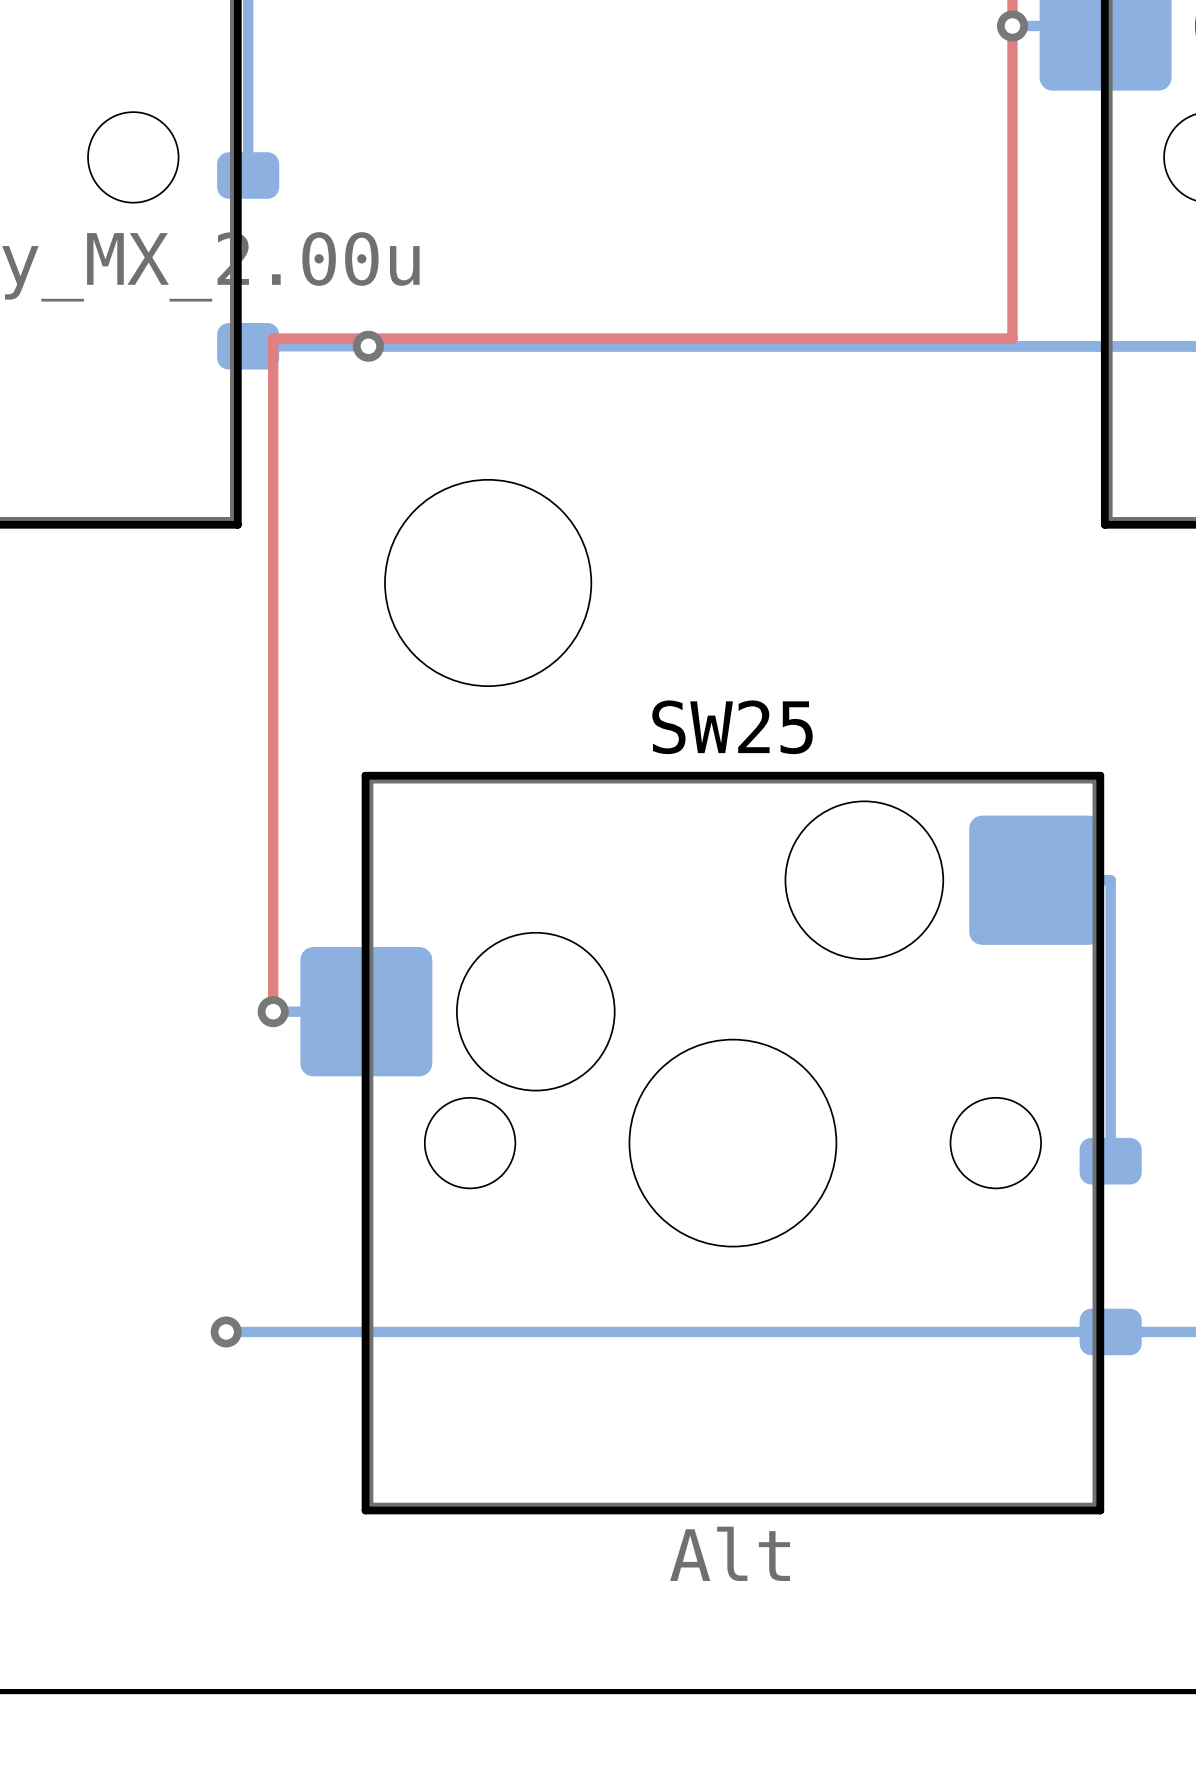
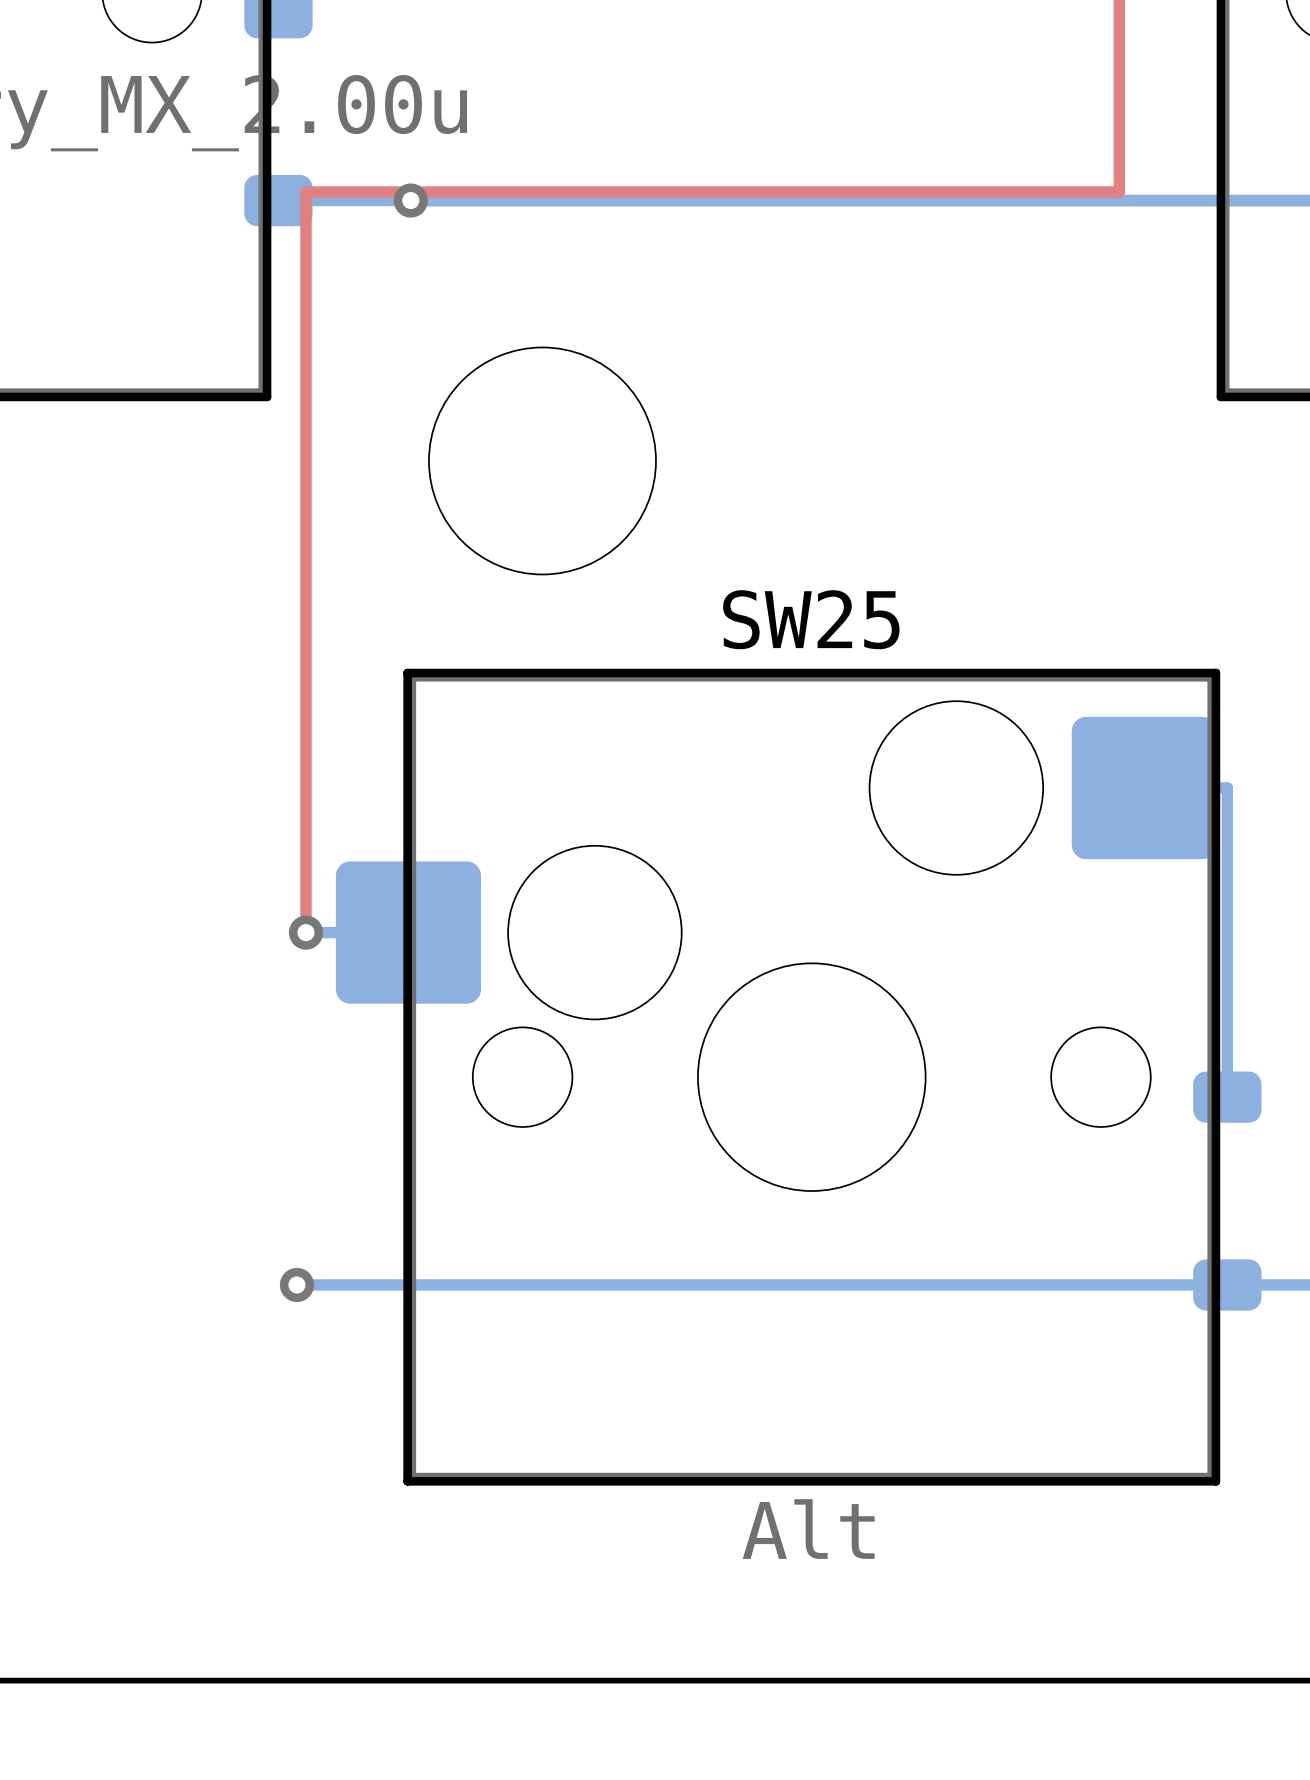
bottom track: (226, 1331) (264, 1331) -> none
via position: (226, 1331) -> (296, 1284)

